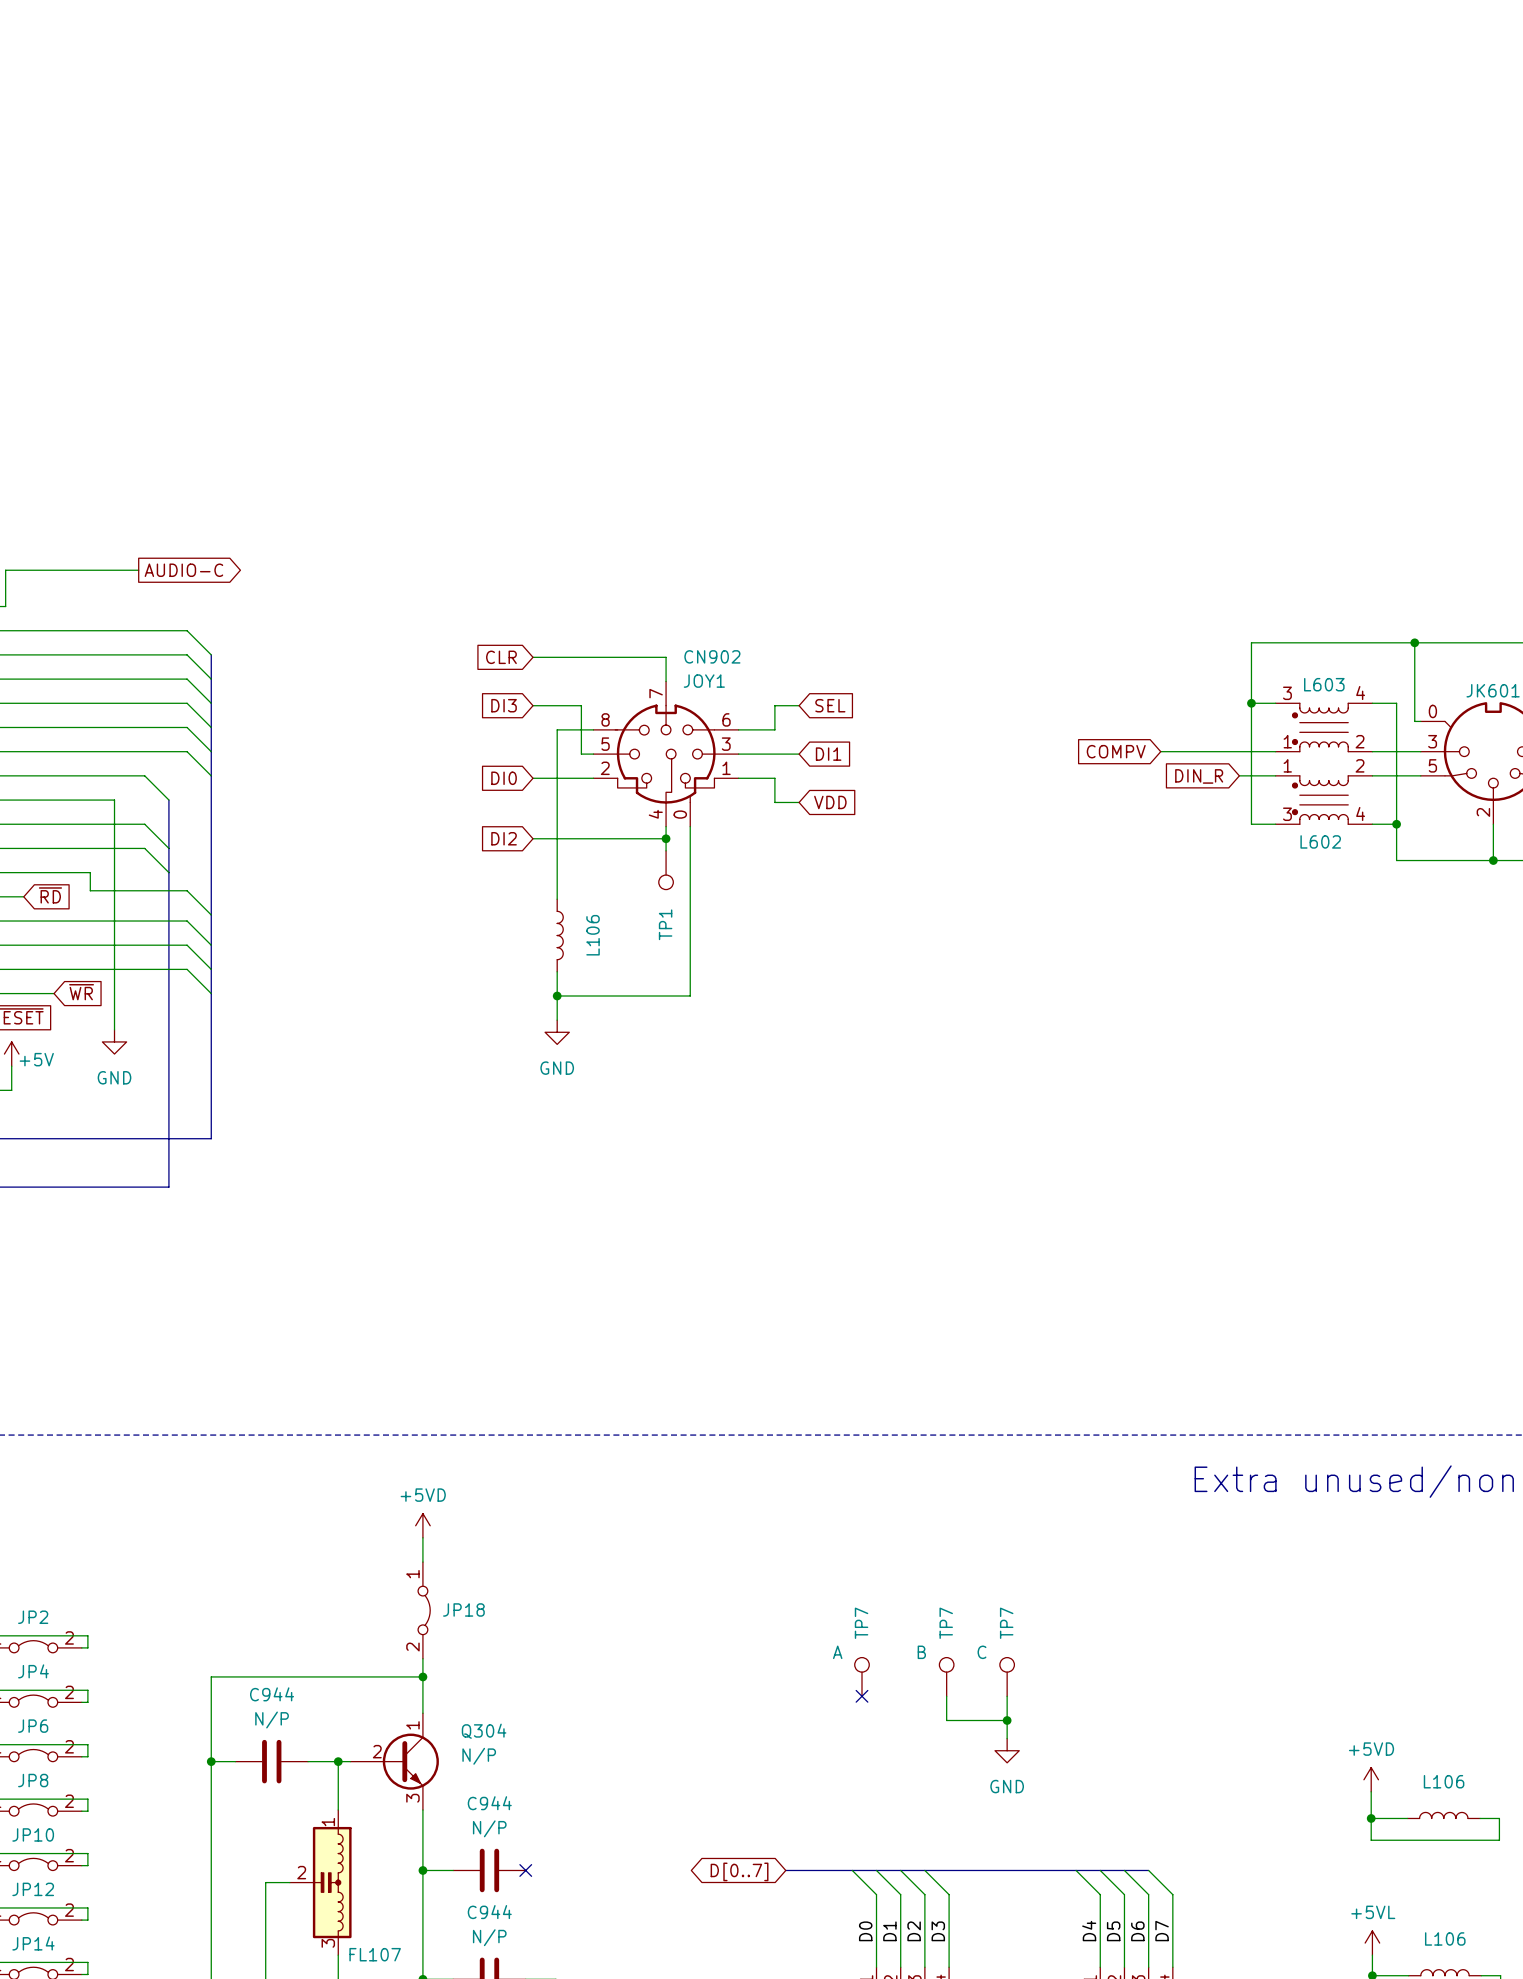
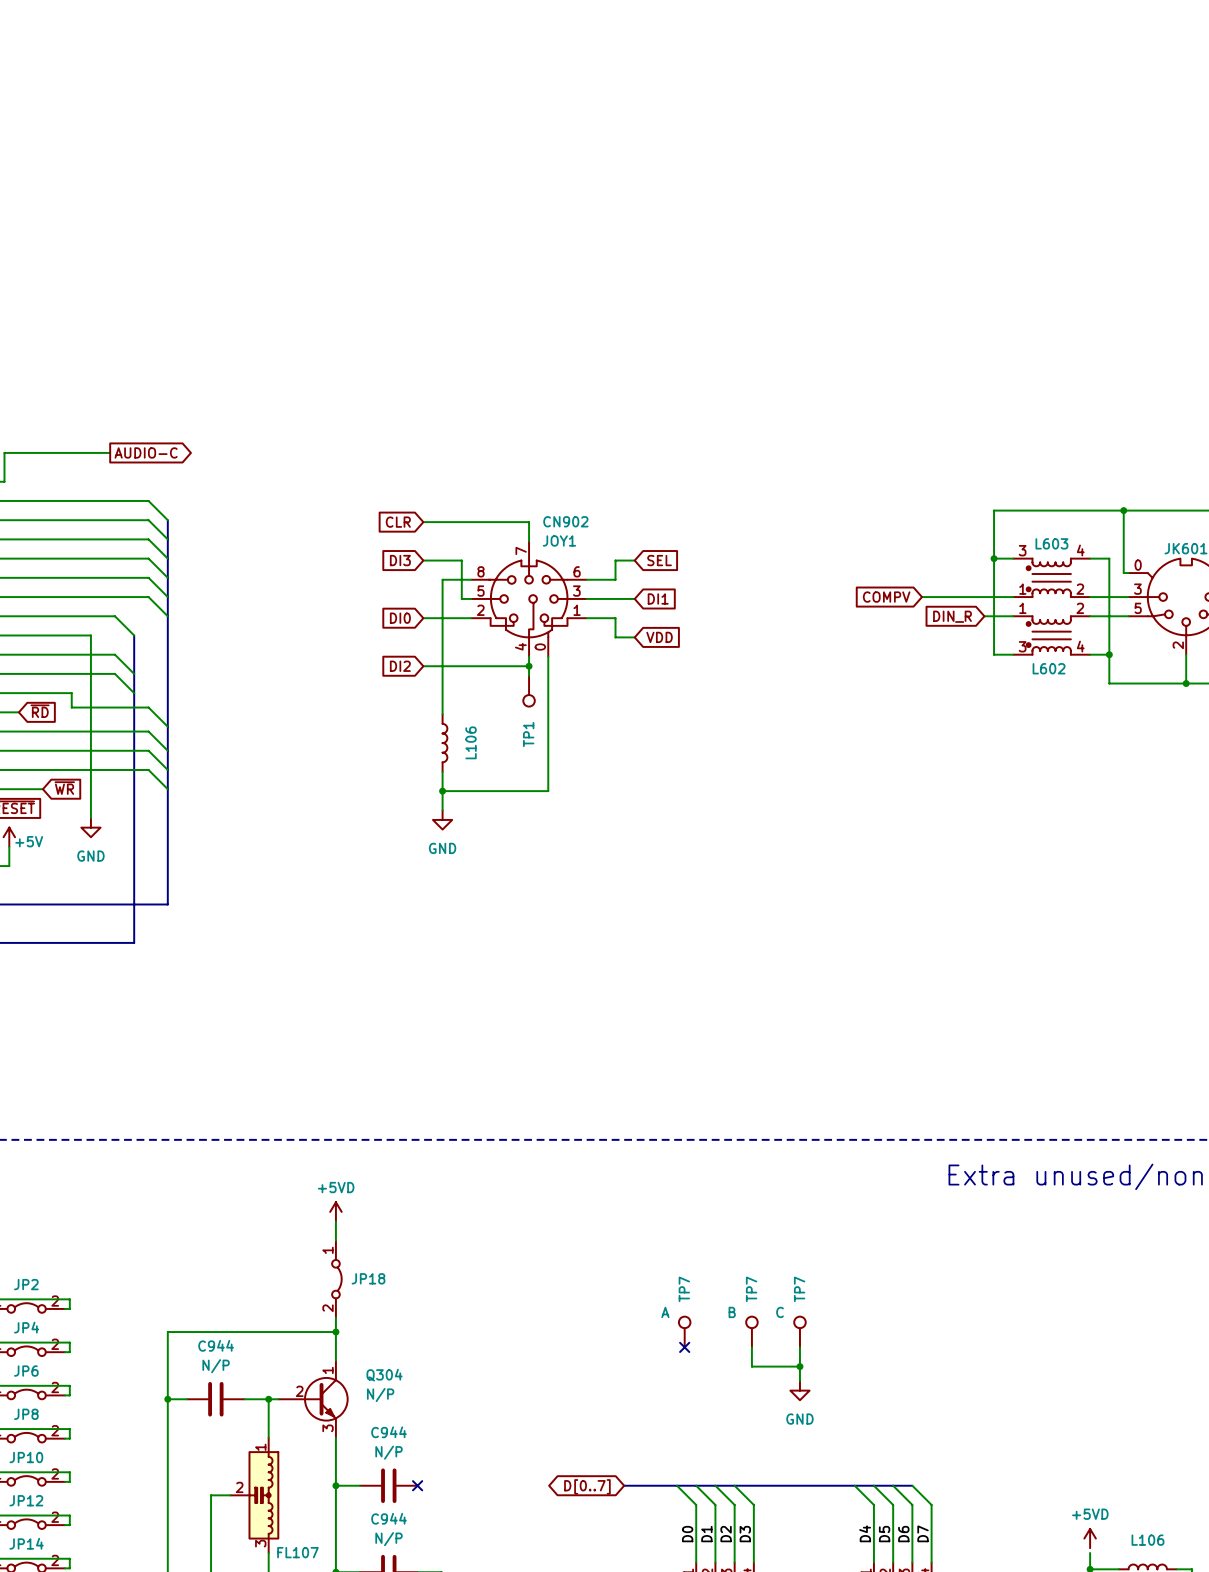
power symbol: +5VD (1371, 1779) -> none
wire: (1371, 1791) (1371, 1840) (1499, 1840) (1499, 1818) (1480, 1818) -> none
L106: (1443, 1815) -> none
wire: (1371, 1818) (1407, 1818) -> none
junction: (1371, 1818) -> none
power symbol: +5VL (1372, 1943) -> +5VD (1090, 1538)

